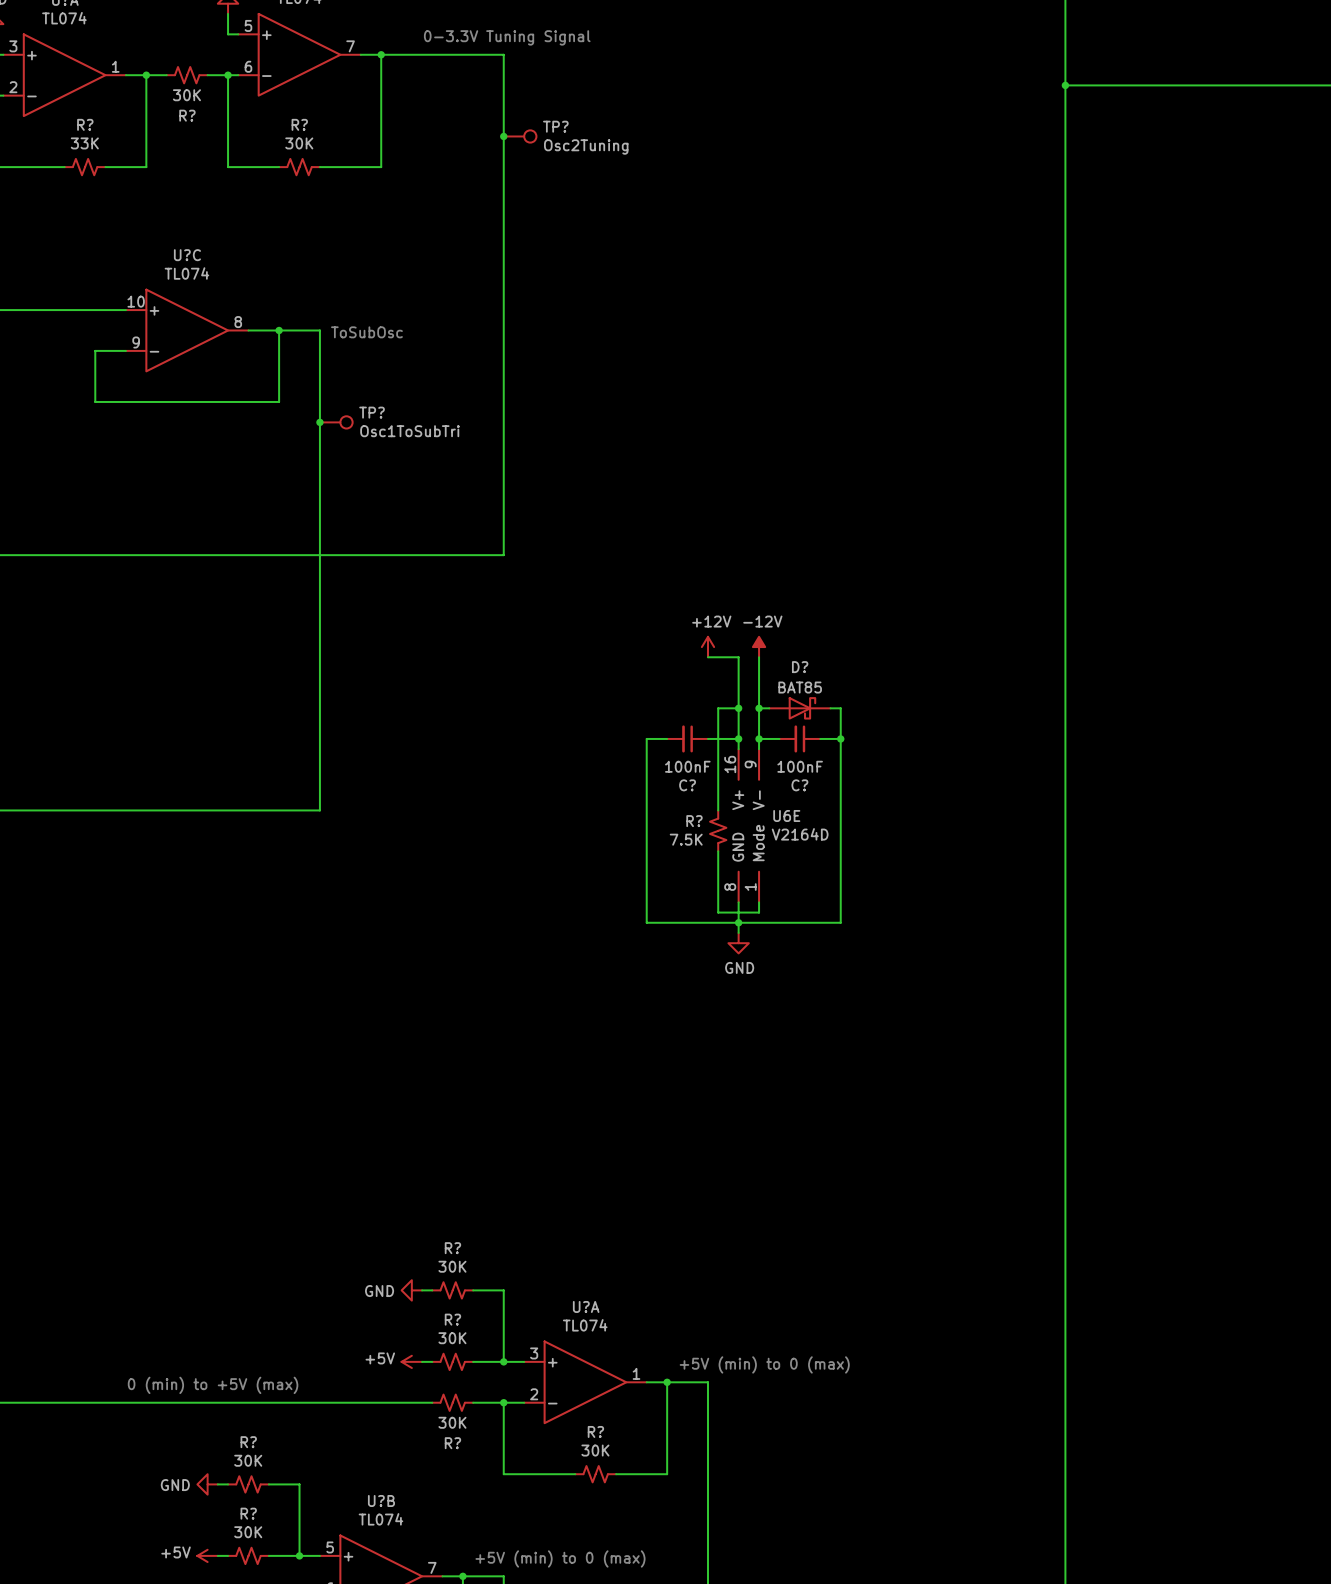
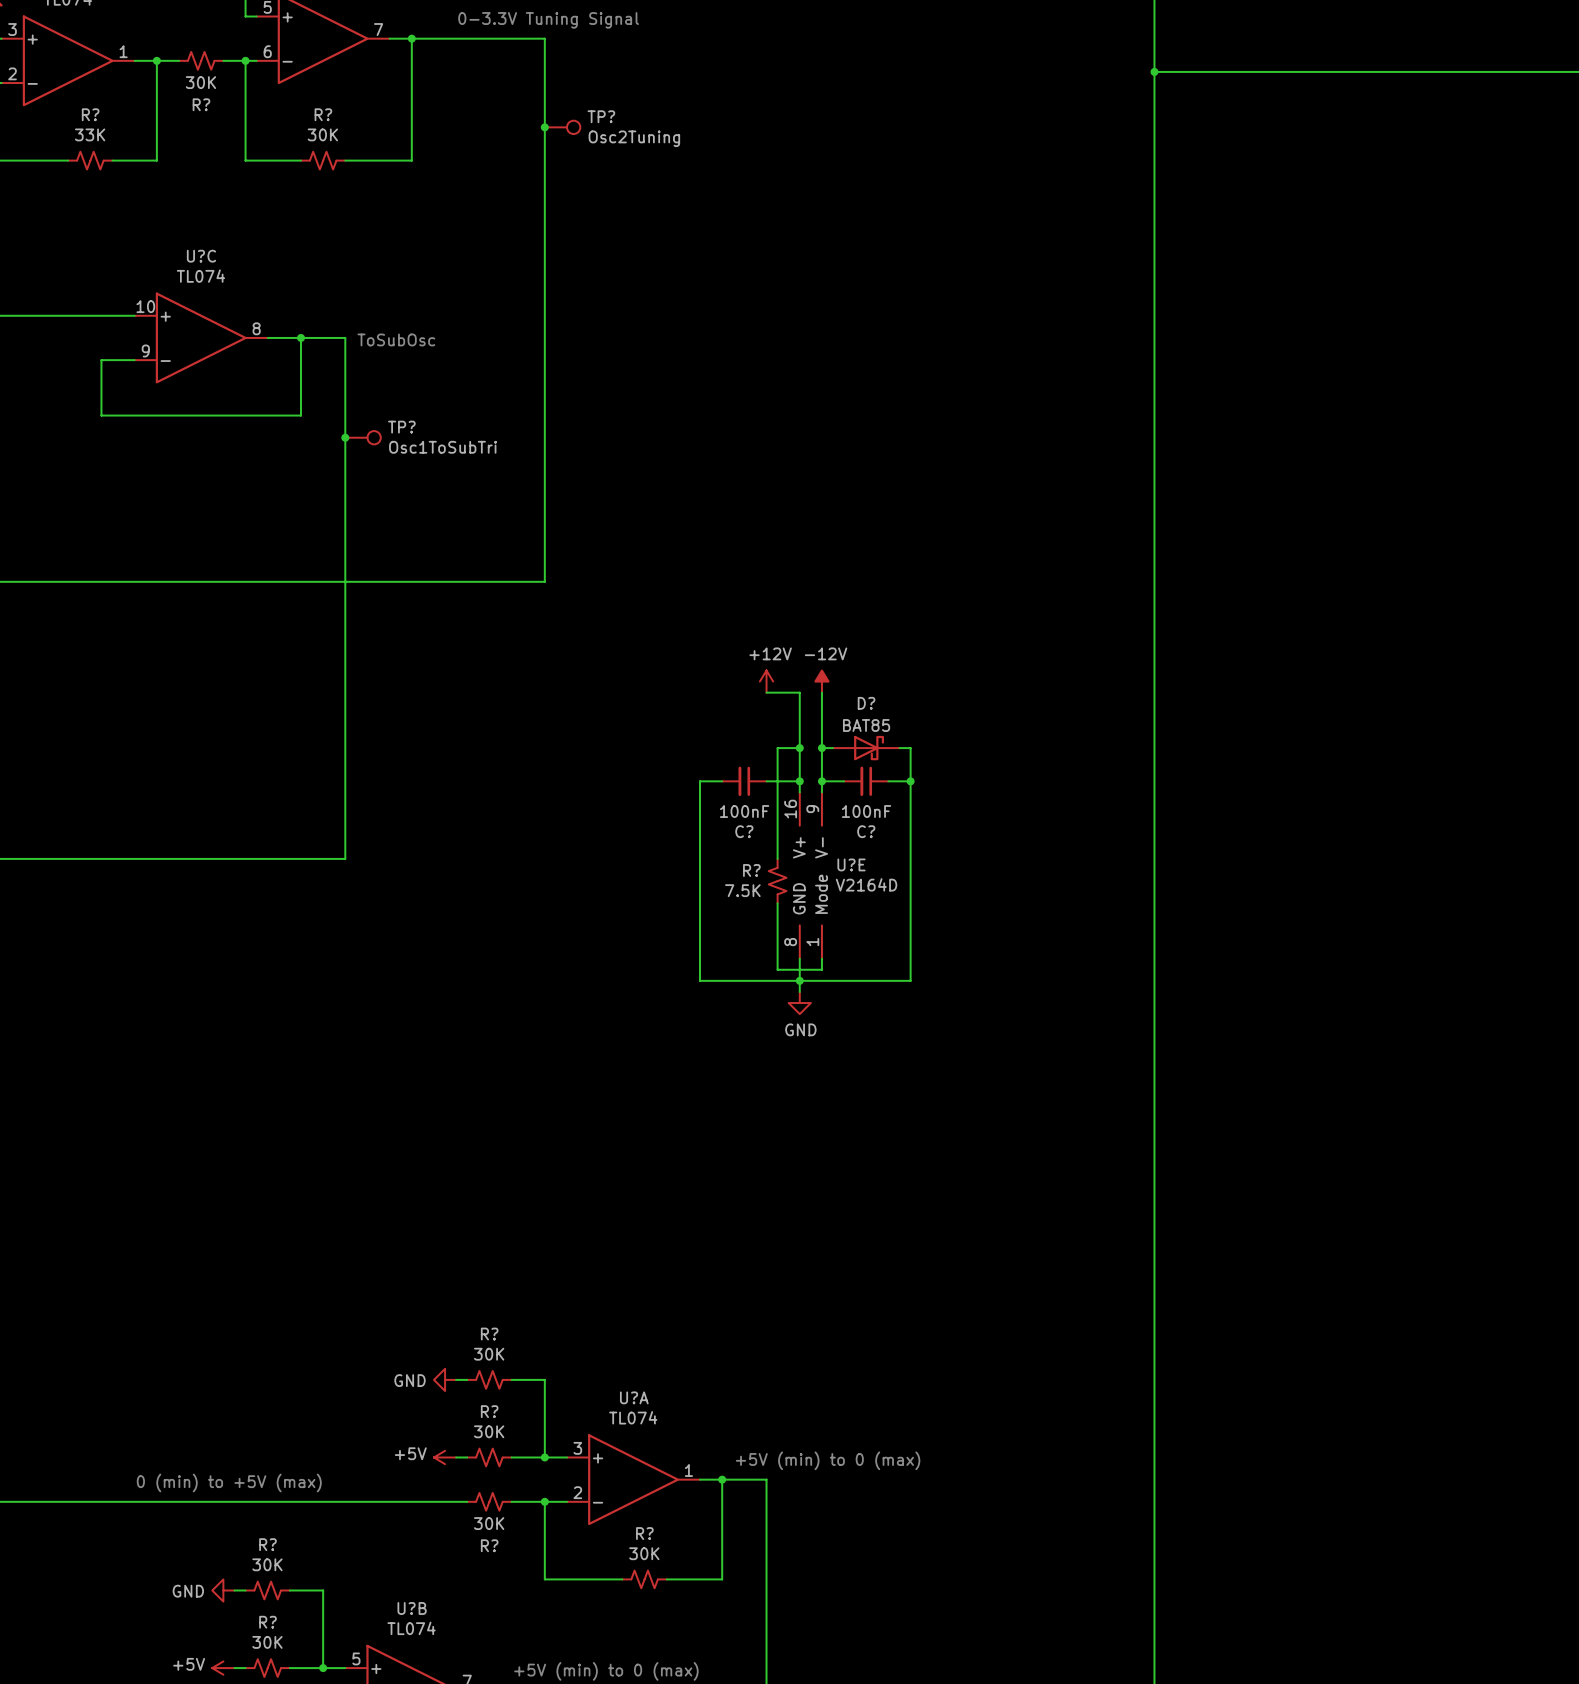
U6E name: U6E (786, 815) -> U?E (851, 864)

